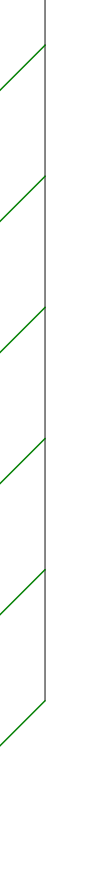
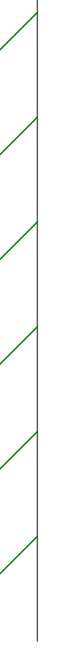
bus: none -> (37, 536) (37, 641)

